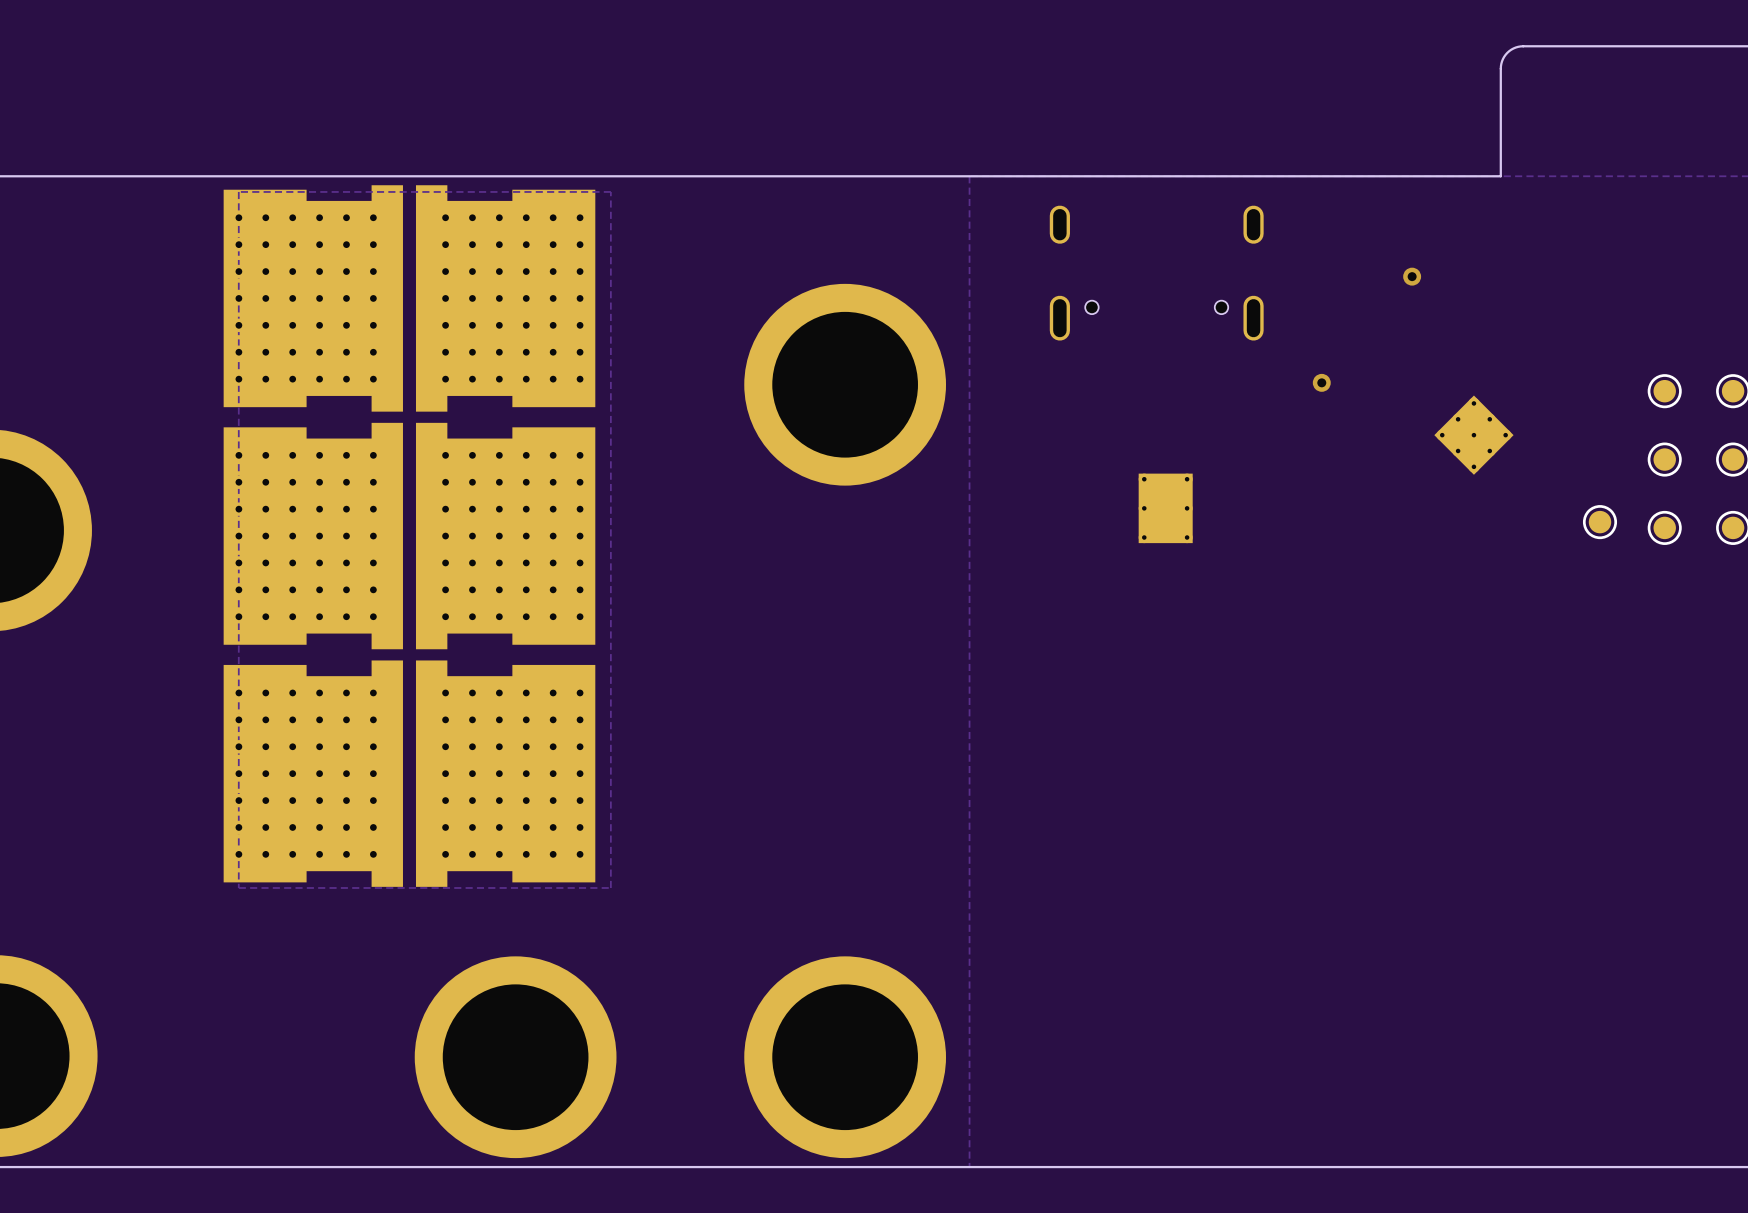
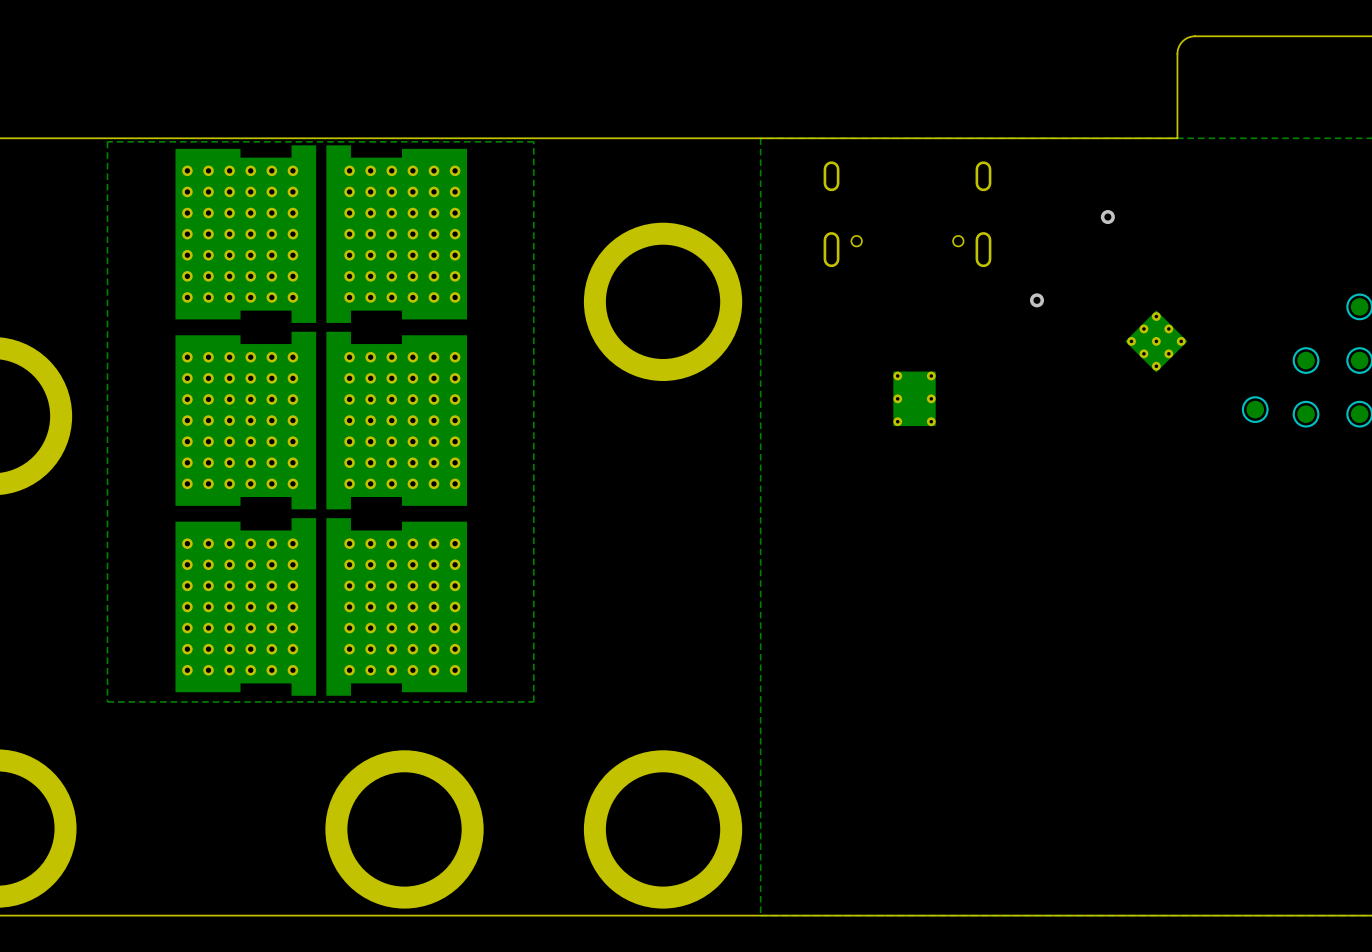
zone outline: (610, 191) (610, 887) (238, 887) (238, 191) (610, 191) -> (533, 141) (533, 701) (107, 701) (107, 141) (533, 141)
part: (1664, 391) -> none

